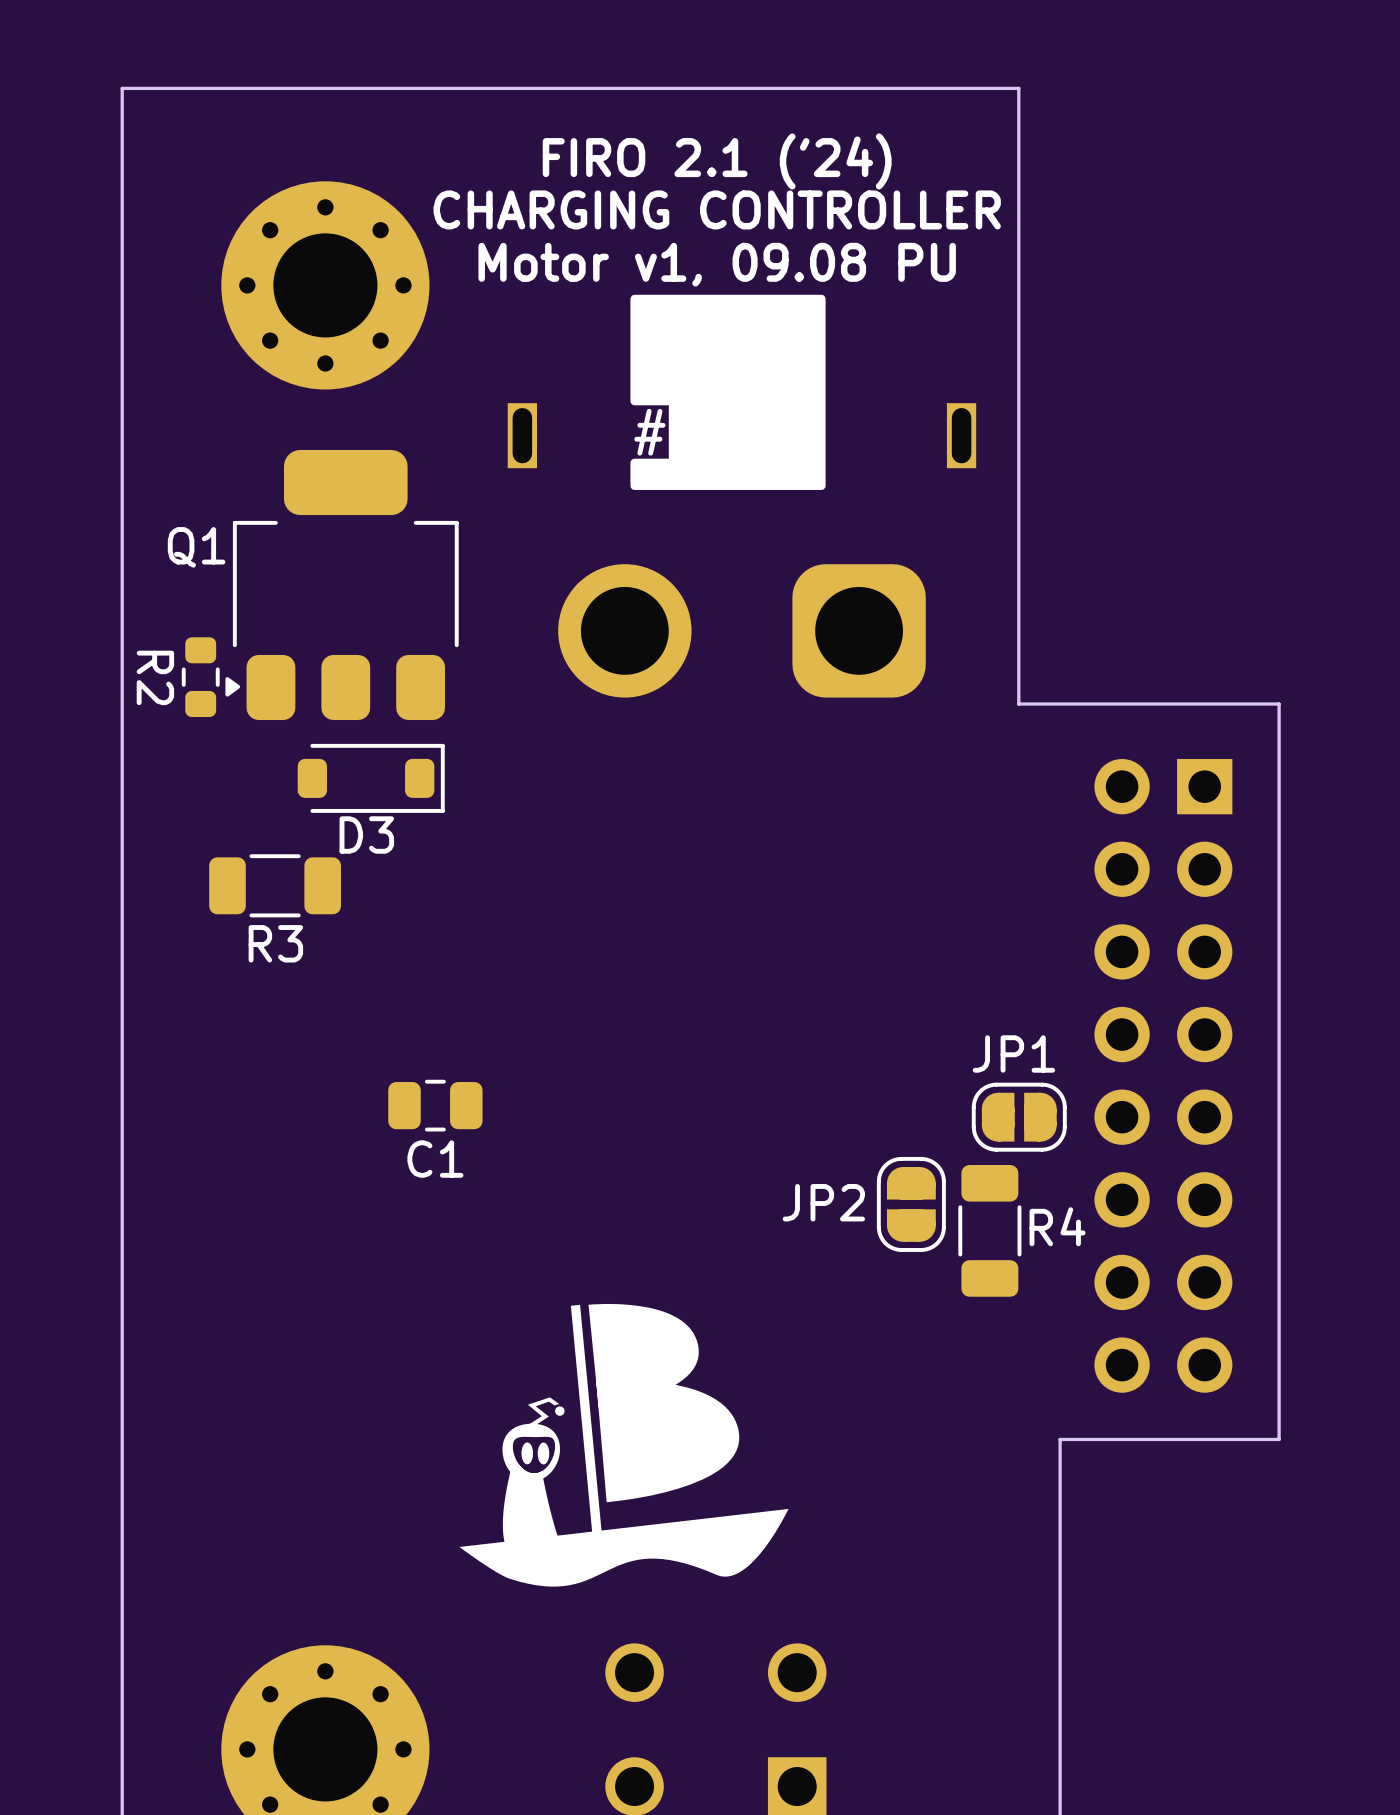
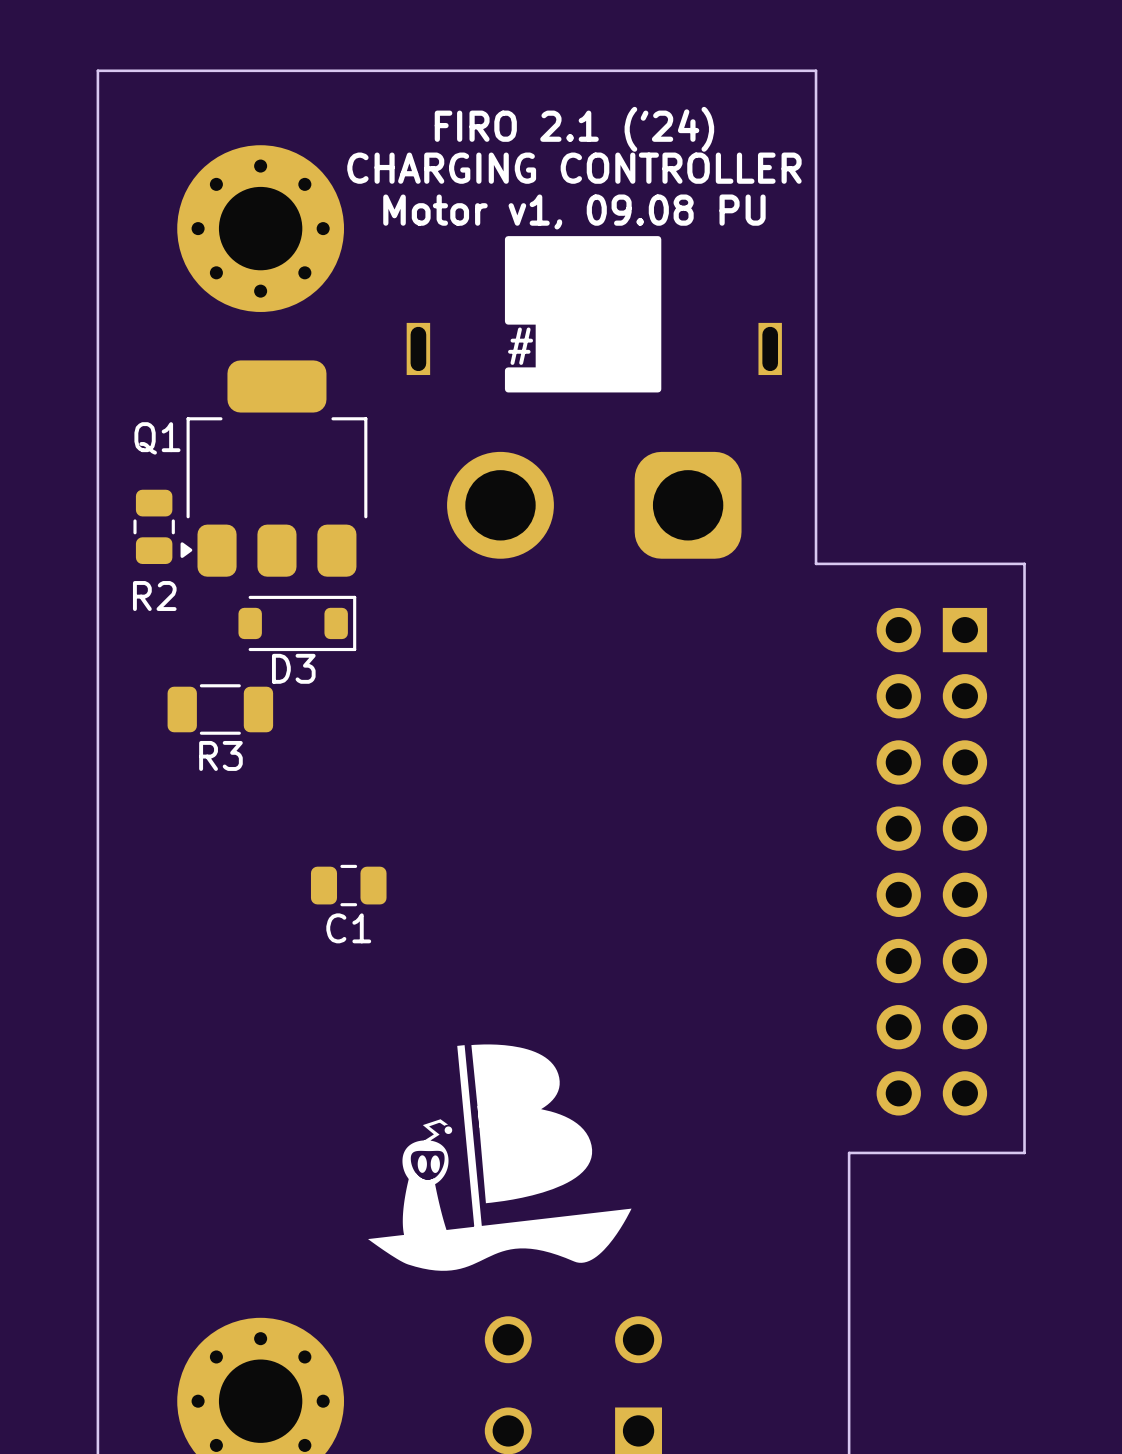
R2 footprint: [181, 637, 220, 717] -> [133, 489, 175, 565]
R2 name rotation: 0° (155, 677) -> 90° counterclockwise (154, 596)
JP1: (1019, 1117) -> none
JP2: (911, 1204) -> none
R4: (989, 1230) -> none

